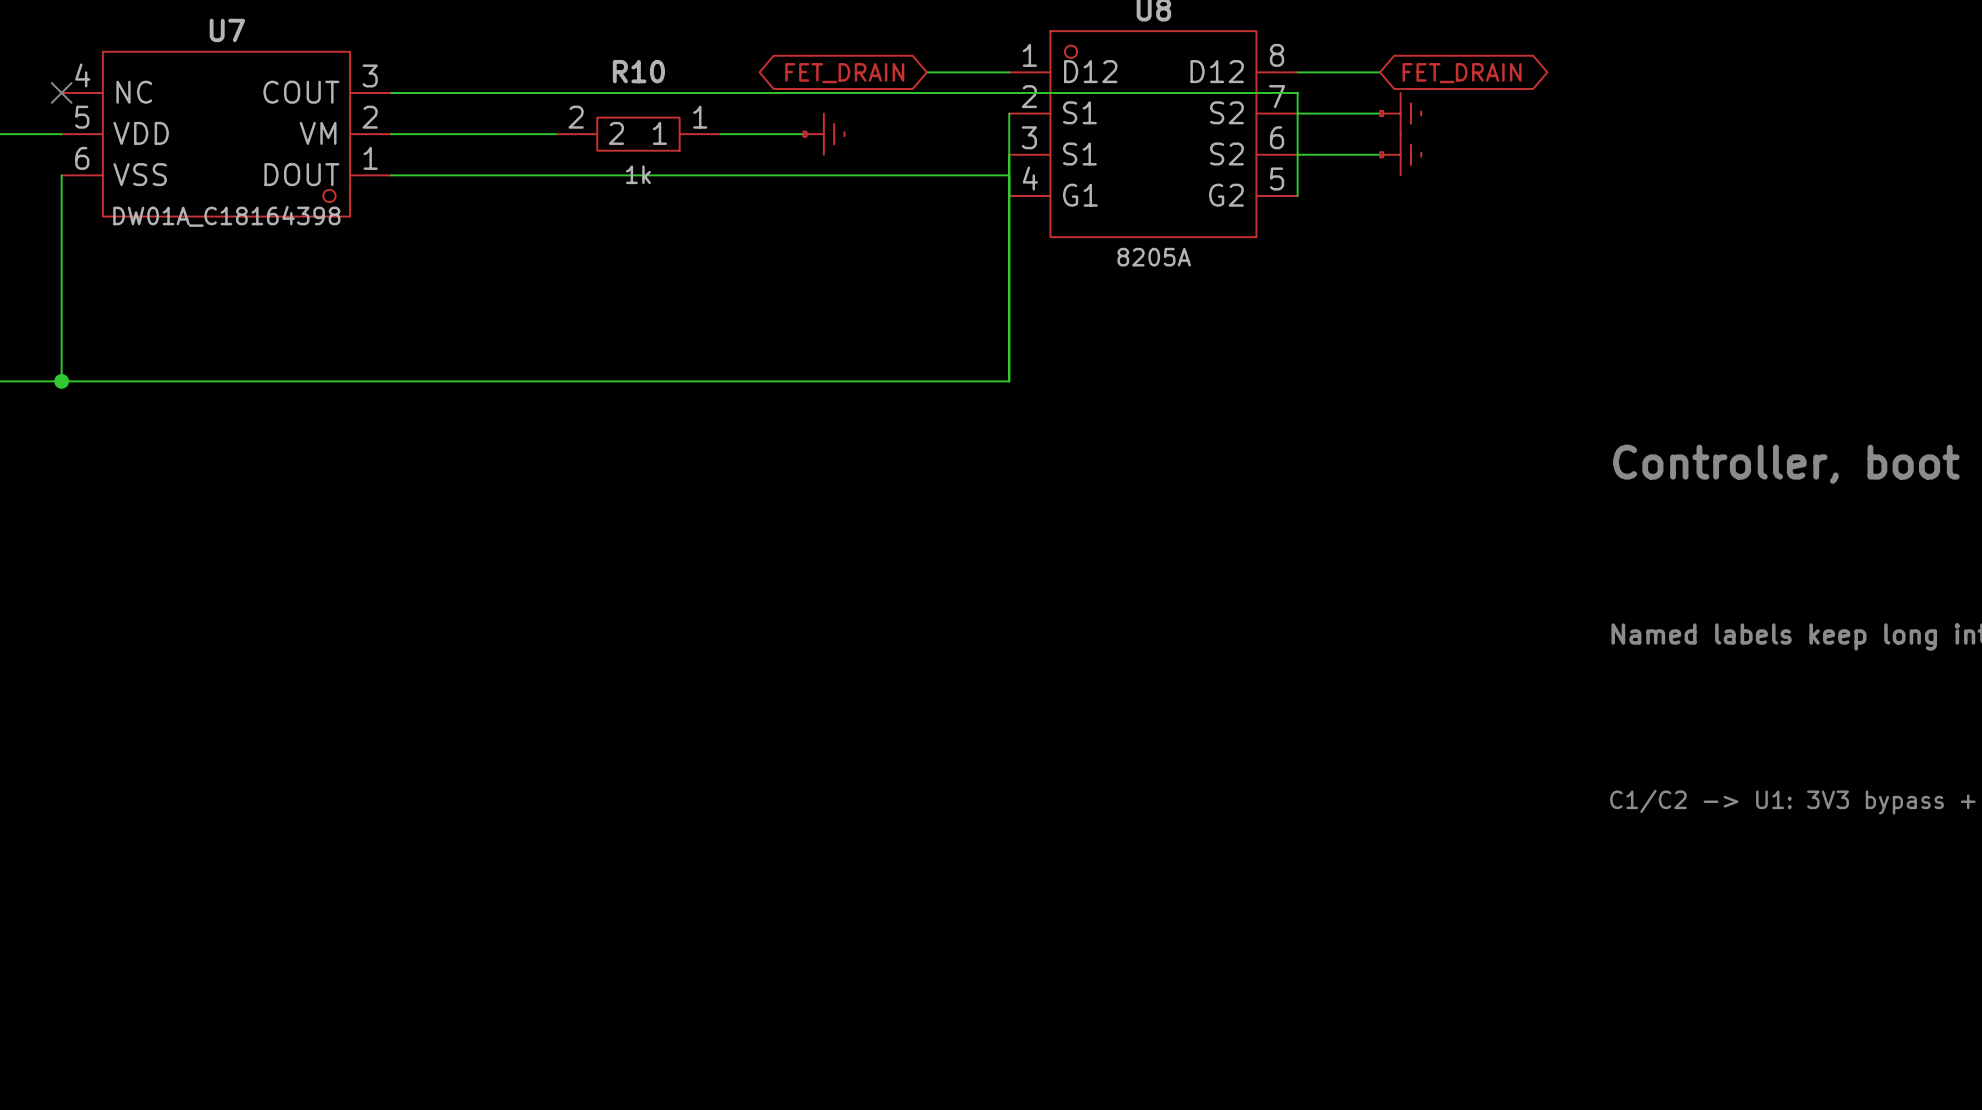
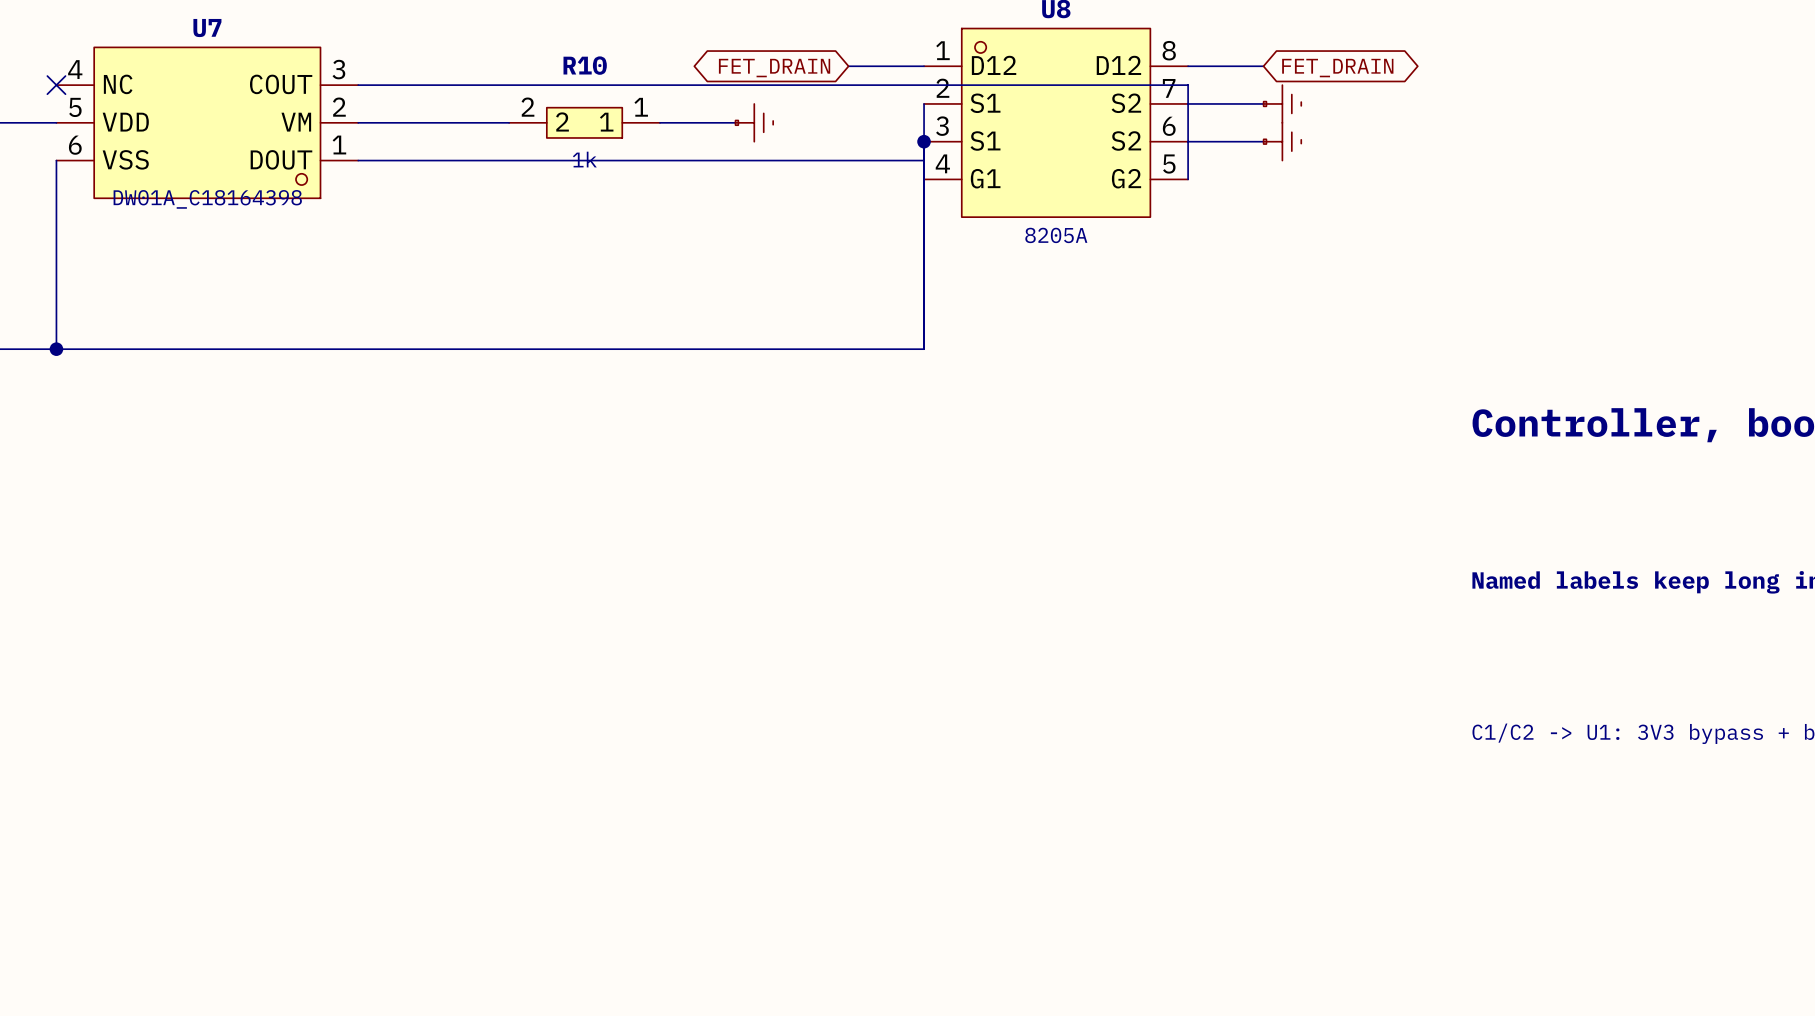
junction: none -> (924, 141)

